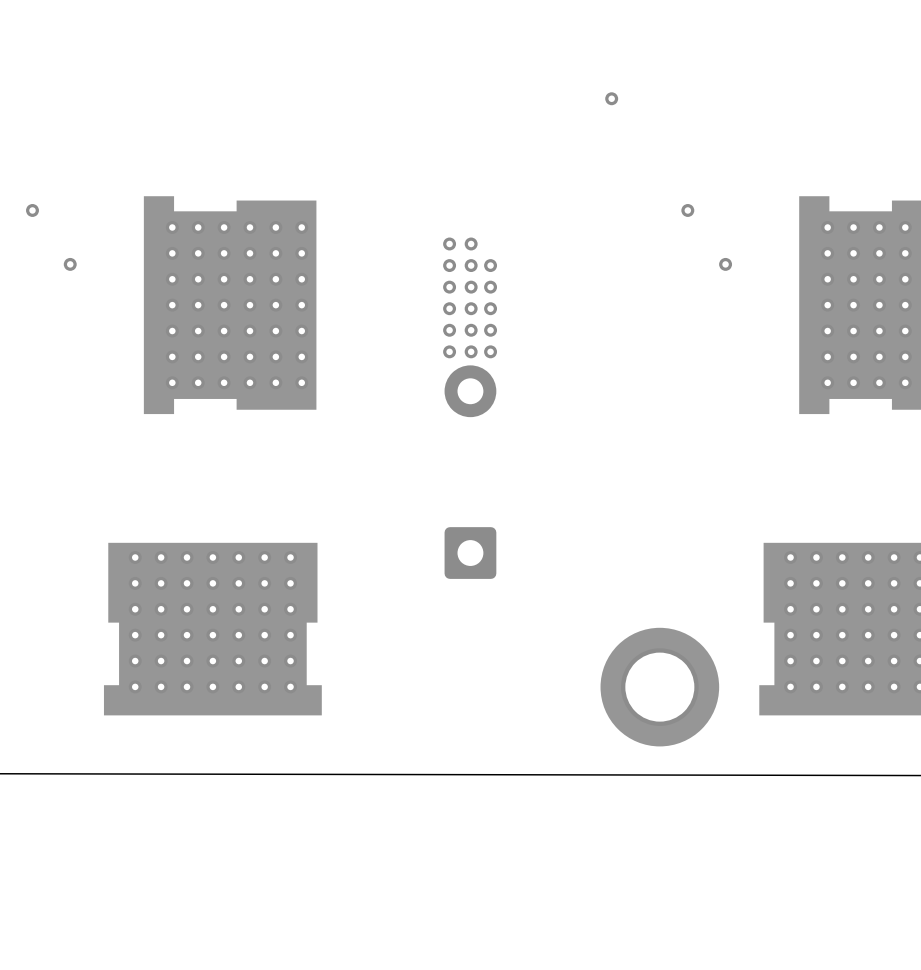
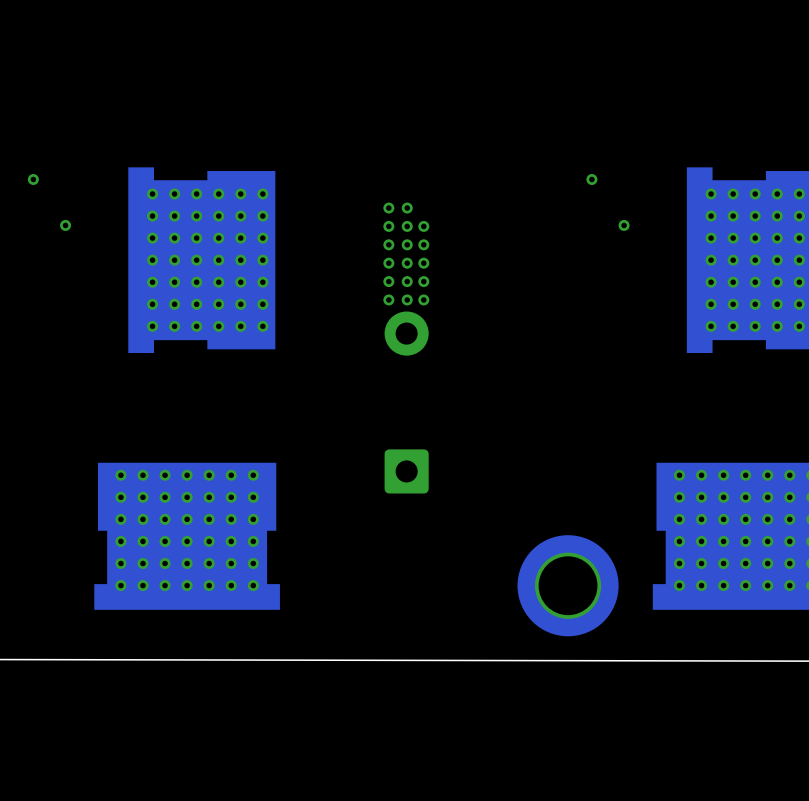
via: (611, 98) -> none

